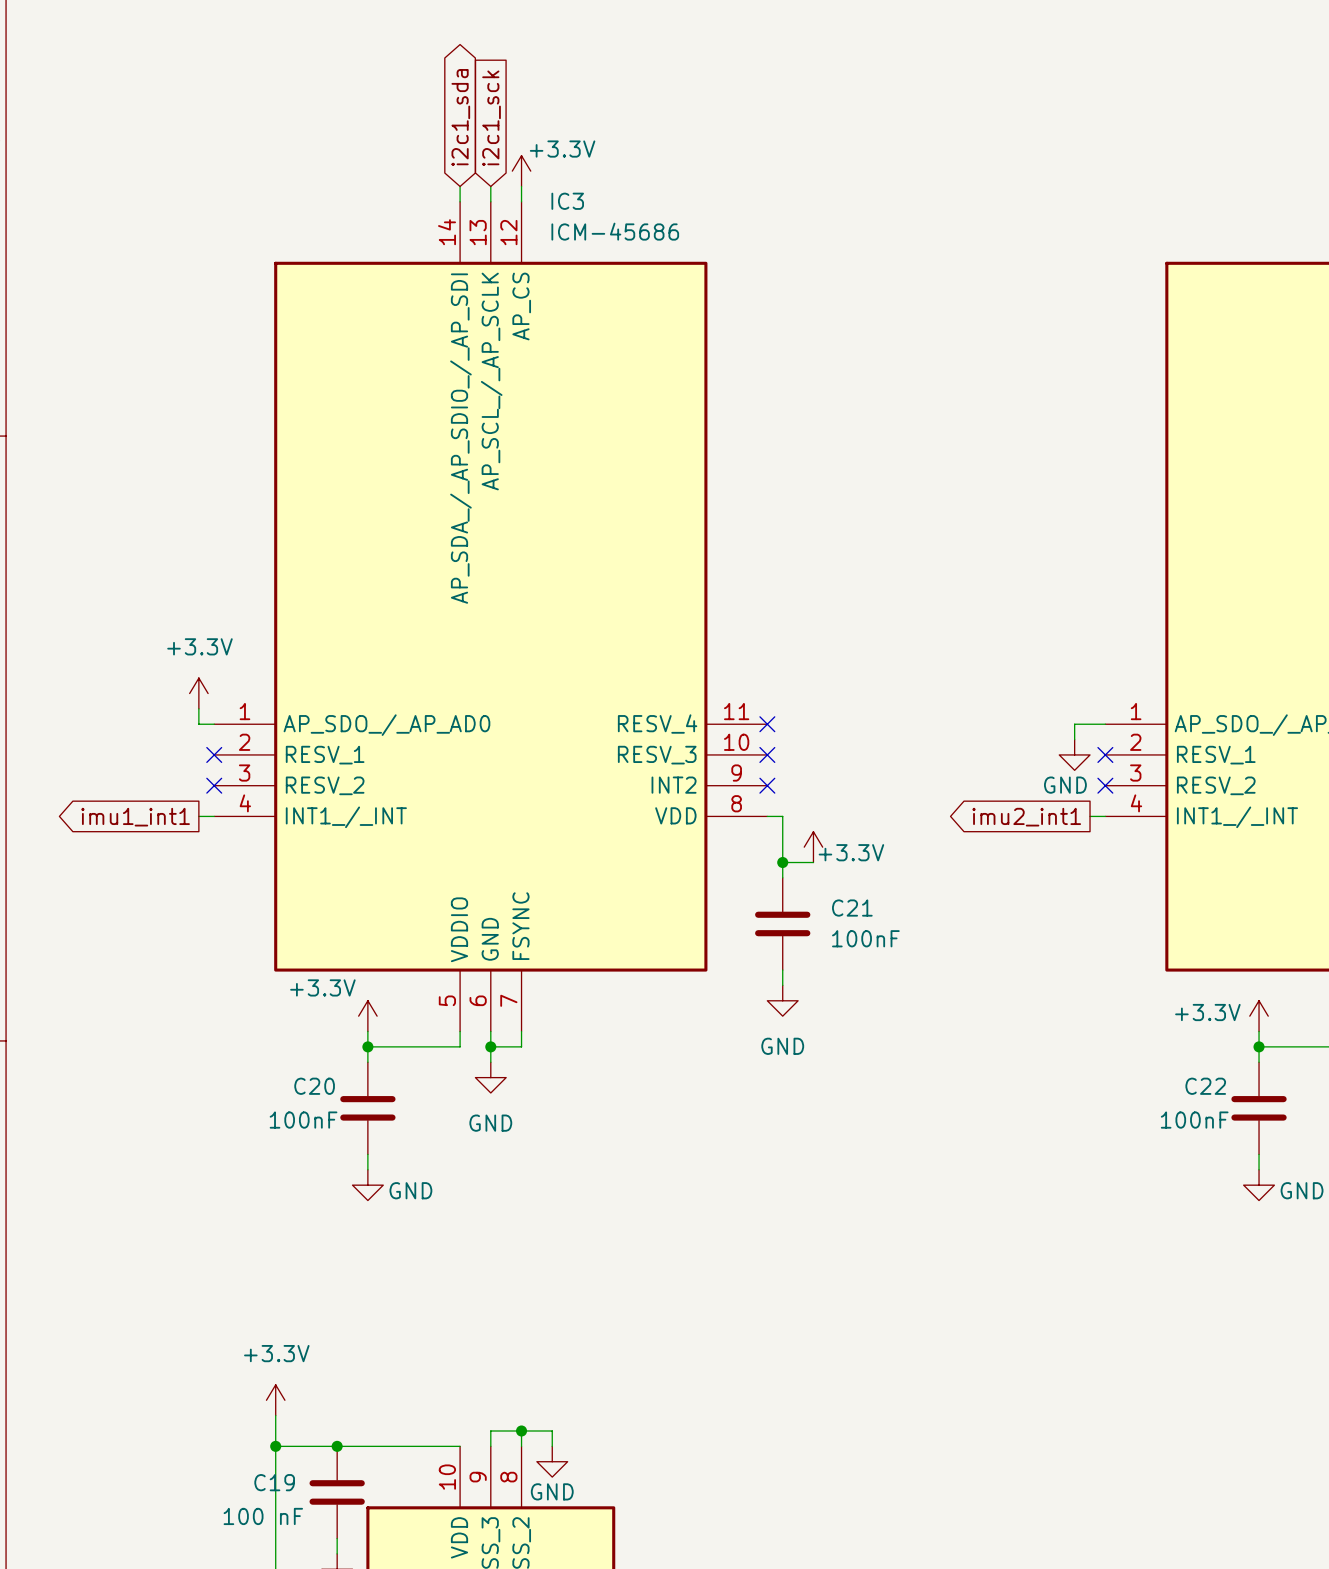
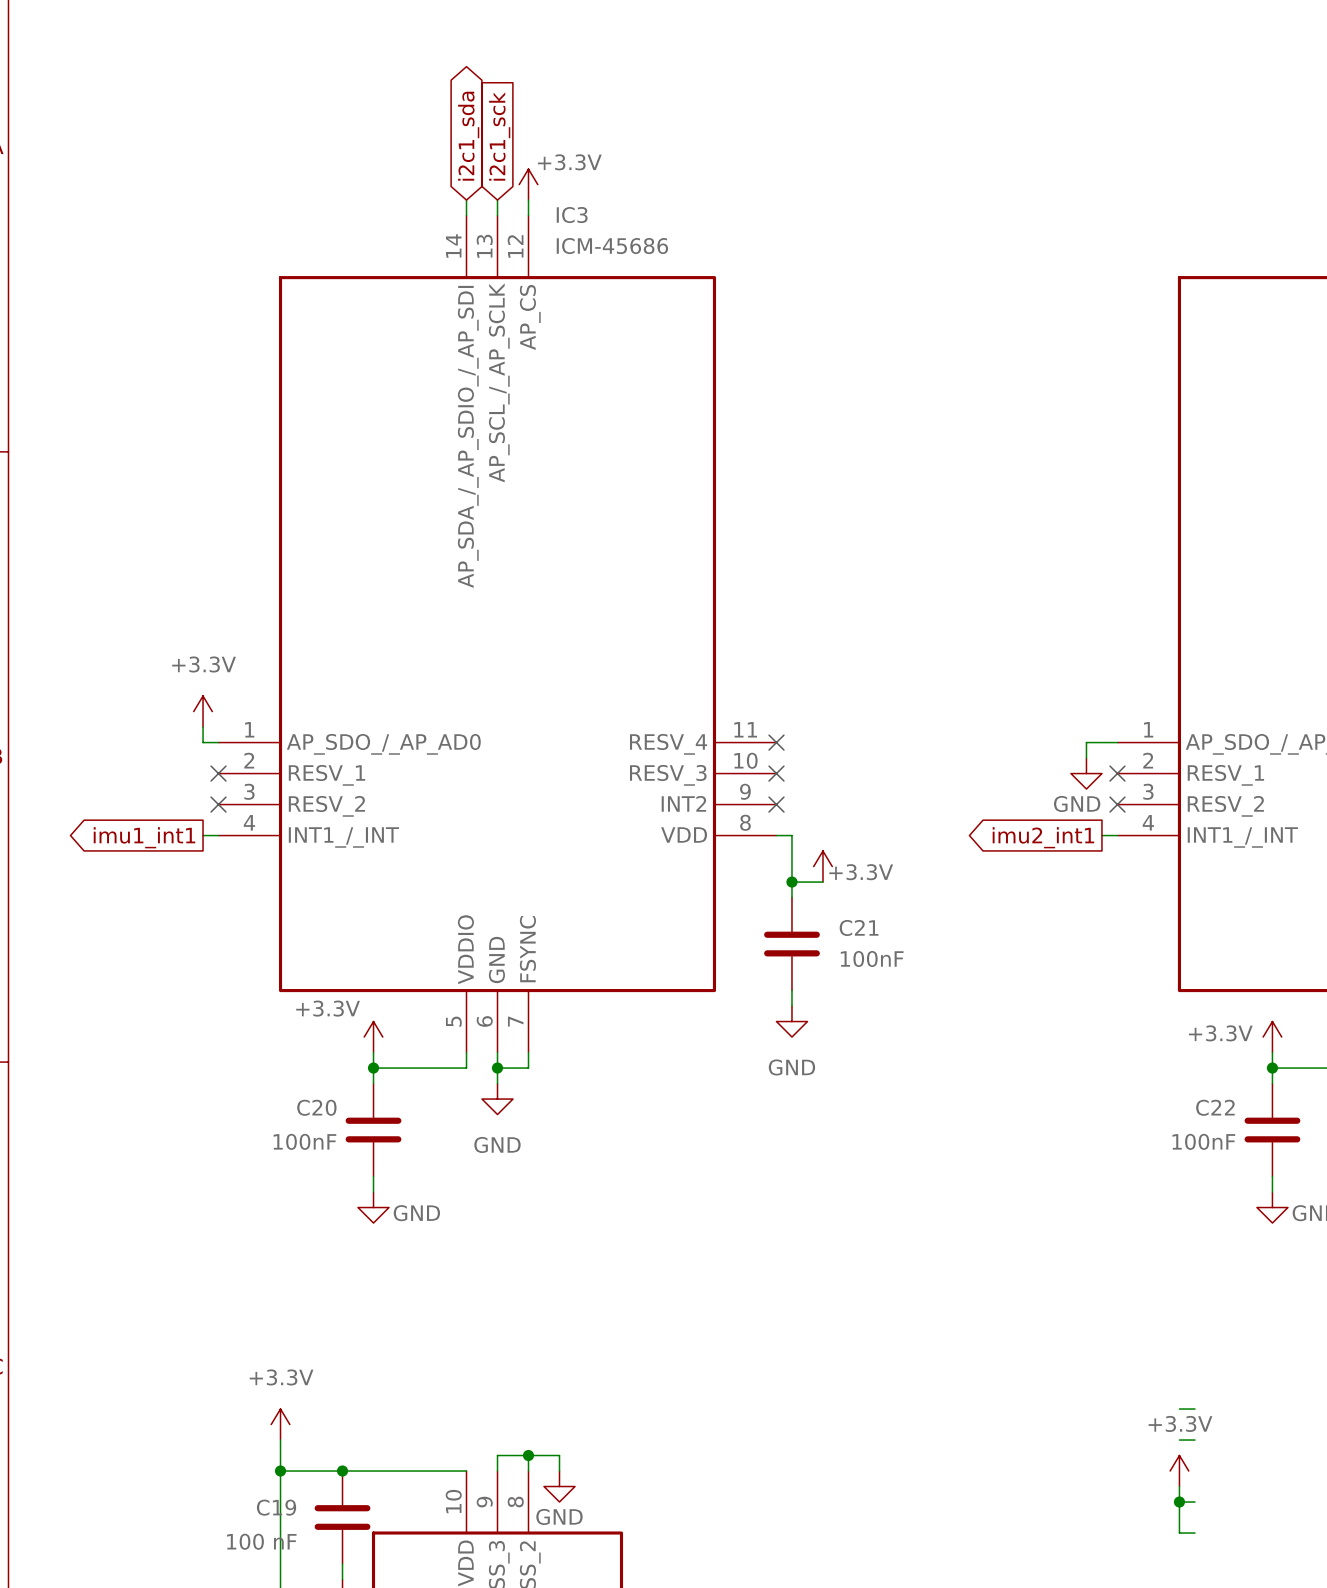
wire: none -> (1179, 1409) (1194, 1409)
wire: none -> (1179, 1440) (1194, 1440)
power symbol: none -> +3.3V (1179, 1471)
wire: none -> (1179, 1486) (1179, 1533) (1194, 1533)
wire: none -> (1179, 1502) (1194, 1502)
junction: none -> (1179, 1502)

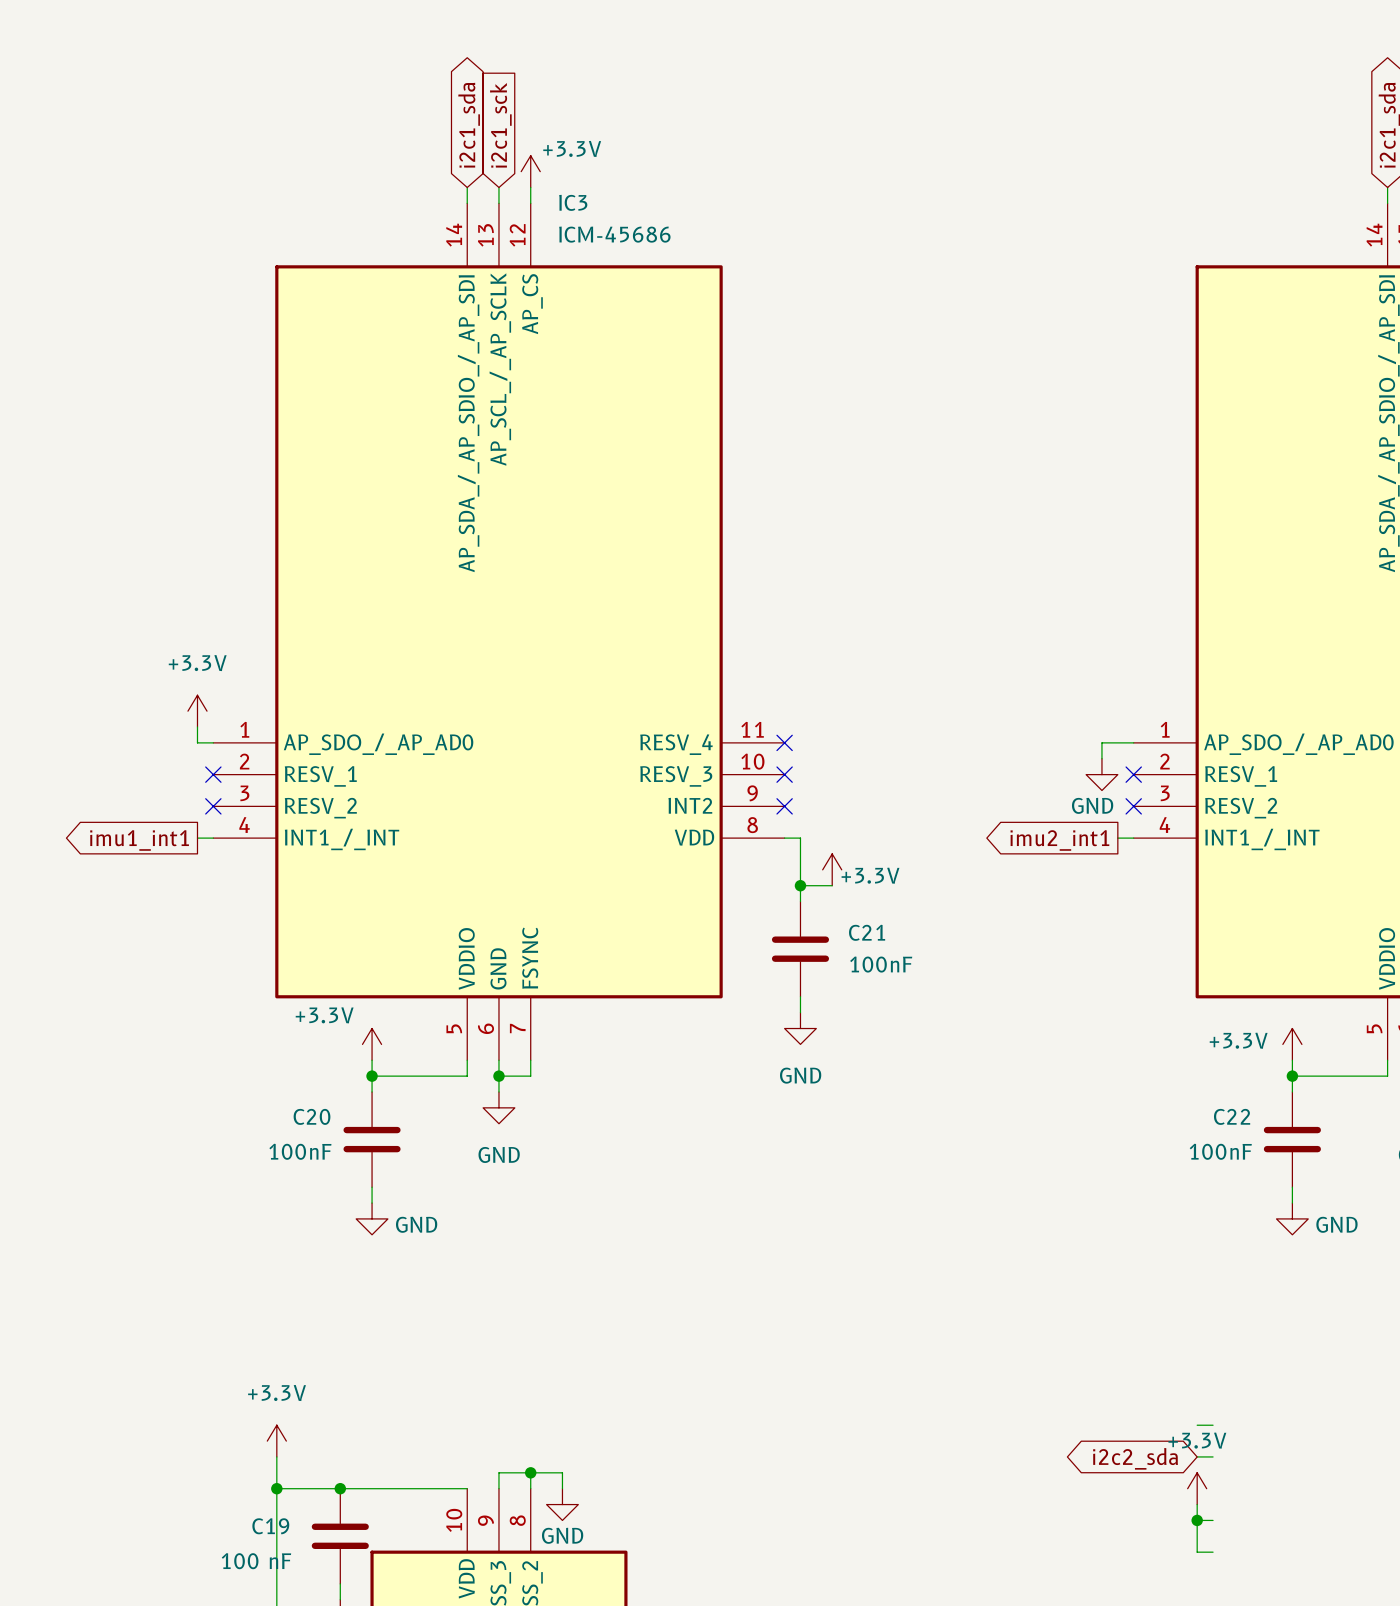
global label: none -> i2c2_sda (1135, 1458)

